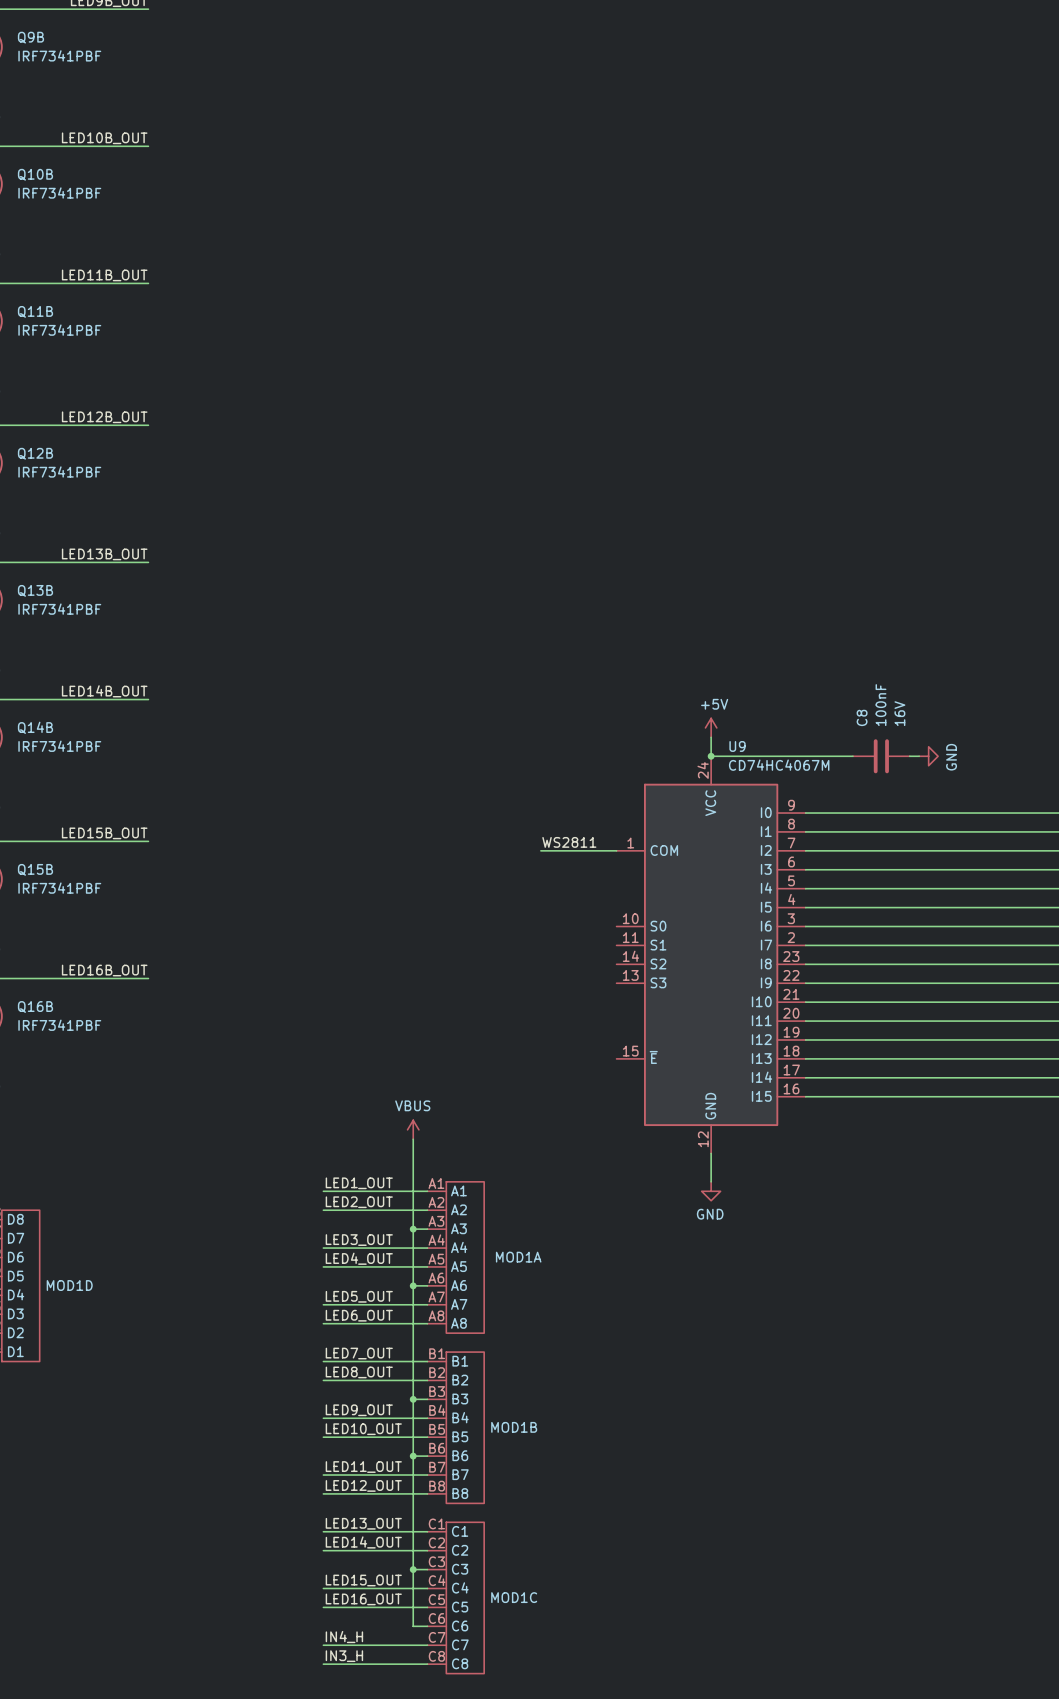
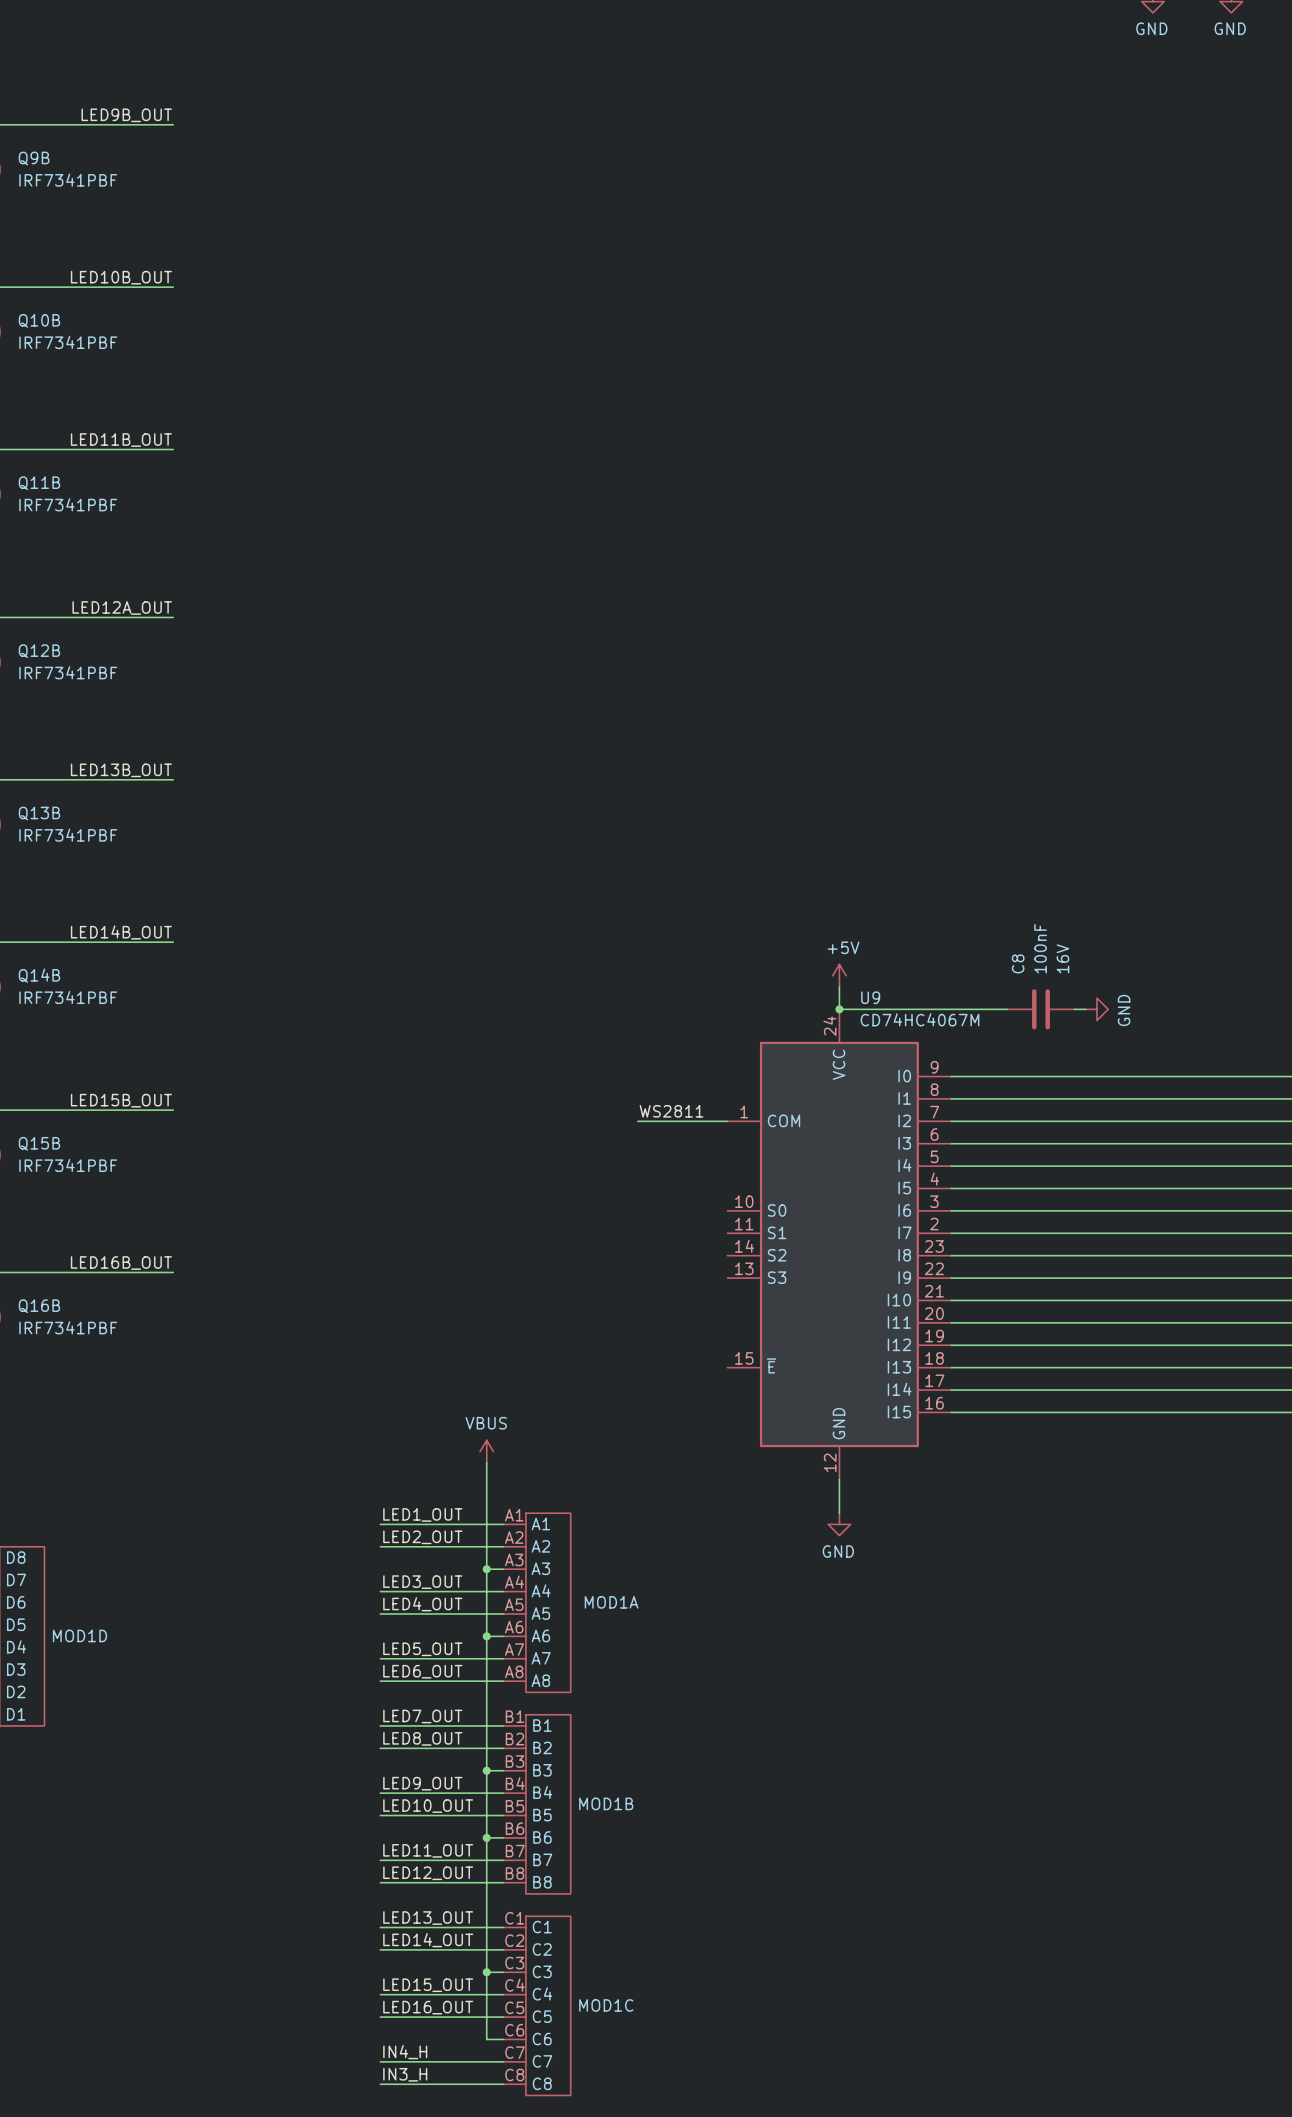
label: LED12B_OUT (104, 417) -> LED12A_OUT (122, 608)

